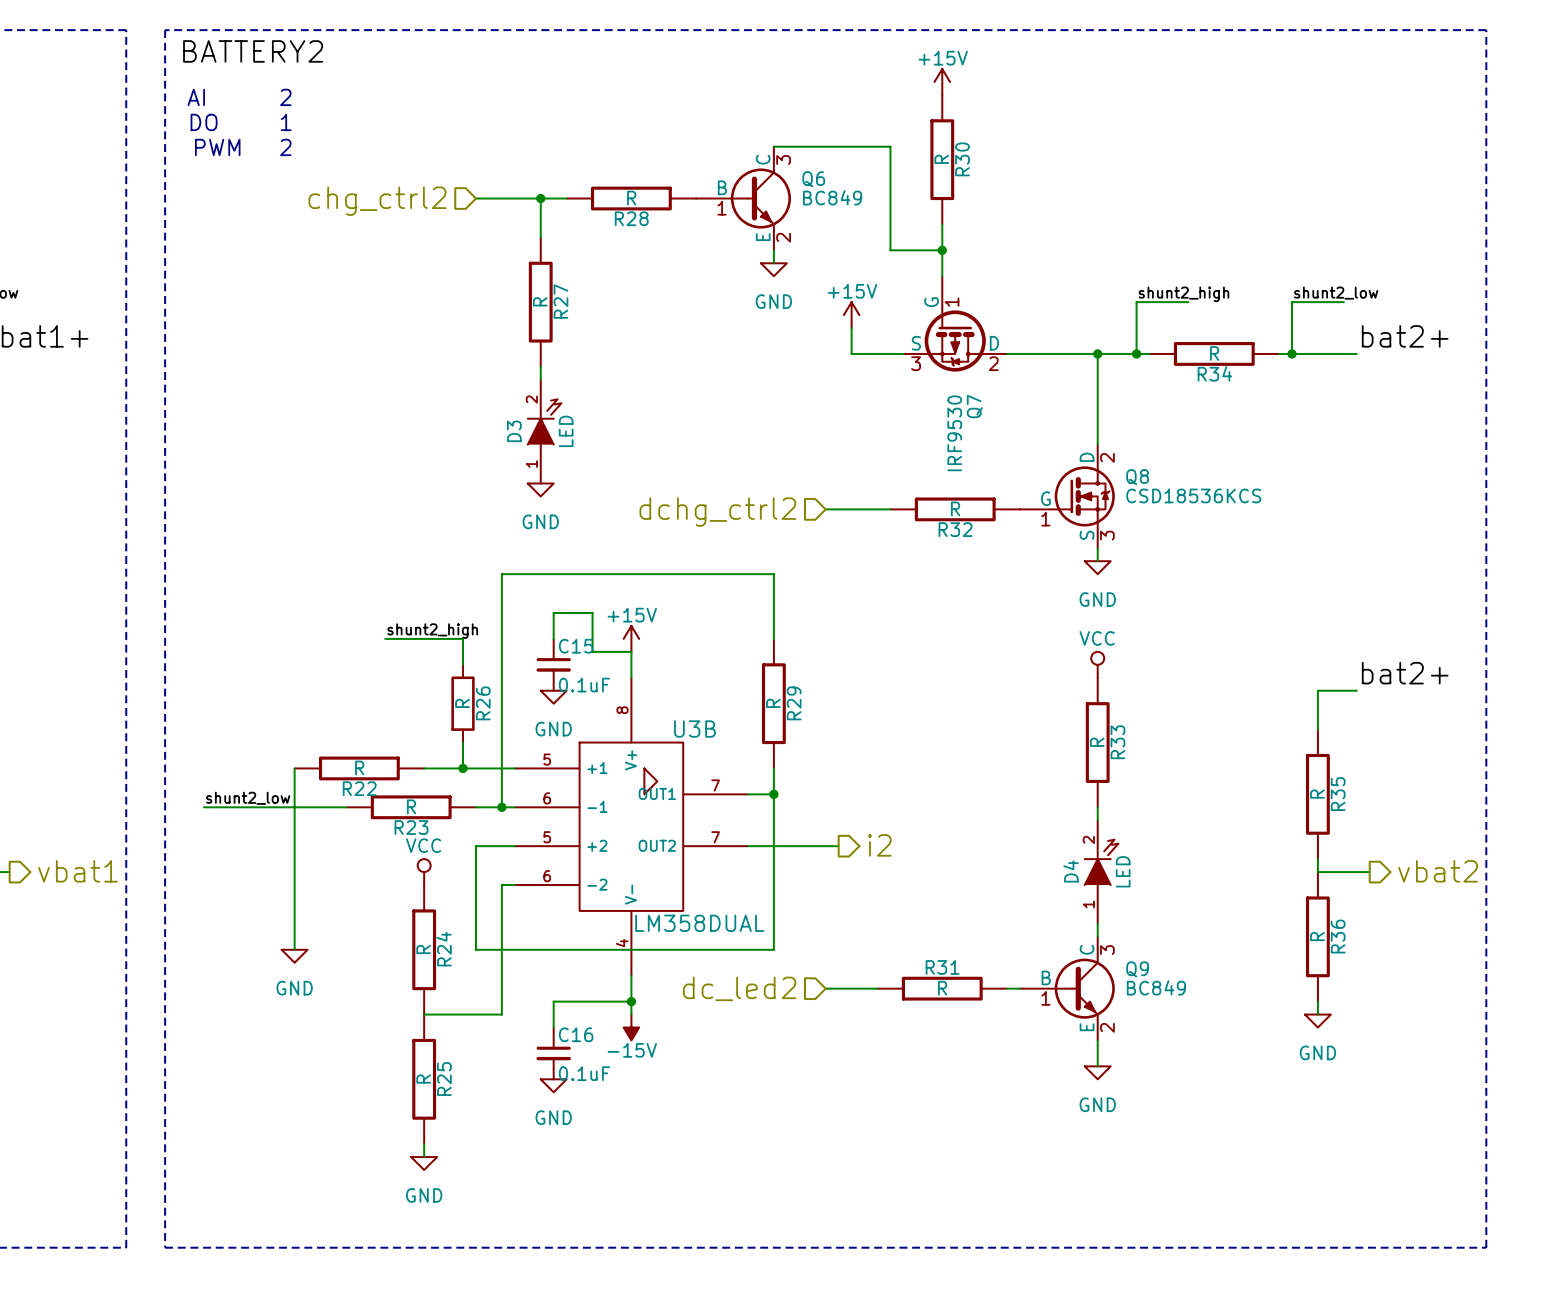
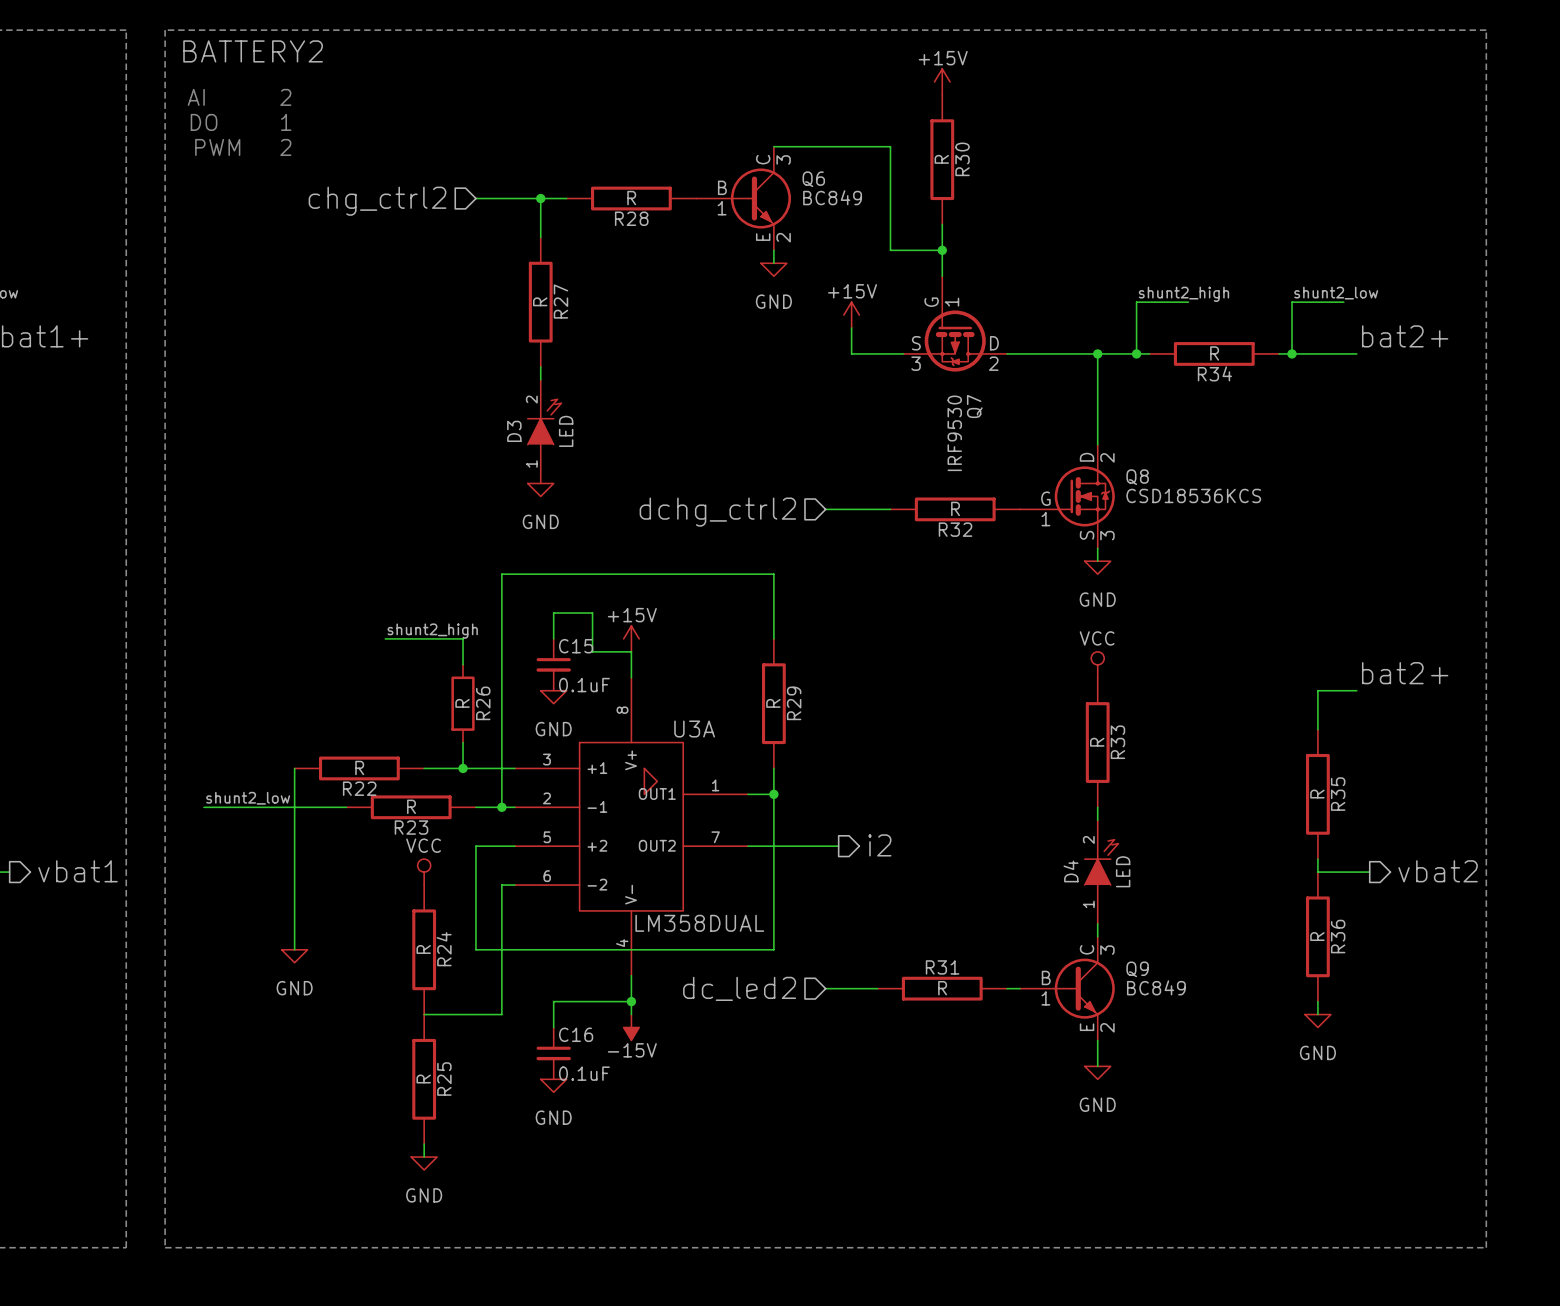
U3B name: U3B (694, 729) -> U3A (694, 729)
U3B pin number: 5 (547, 759) -> 3 (546, 759)
U3B pin number: 7 (715, 785) -> 1 (715, 785)
U3B pin number: 6 (547, 798) -> 2 (546, 798)

